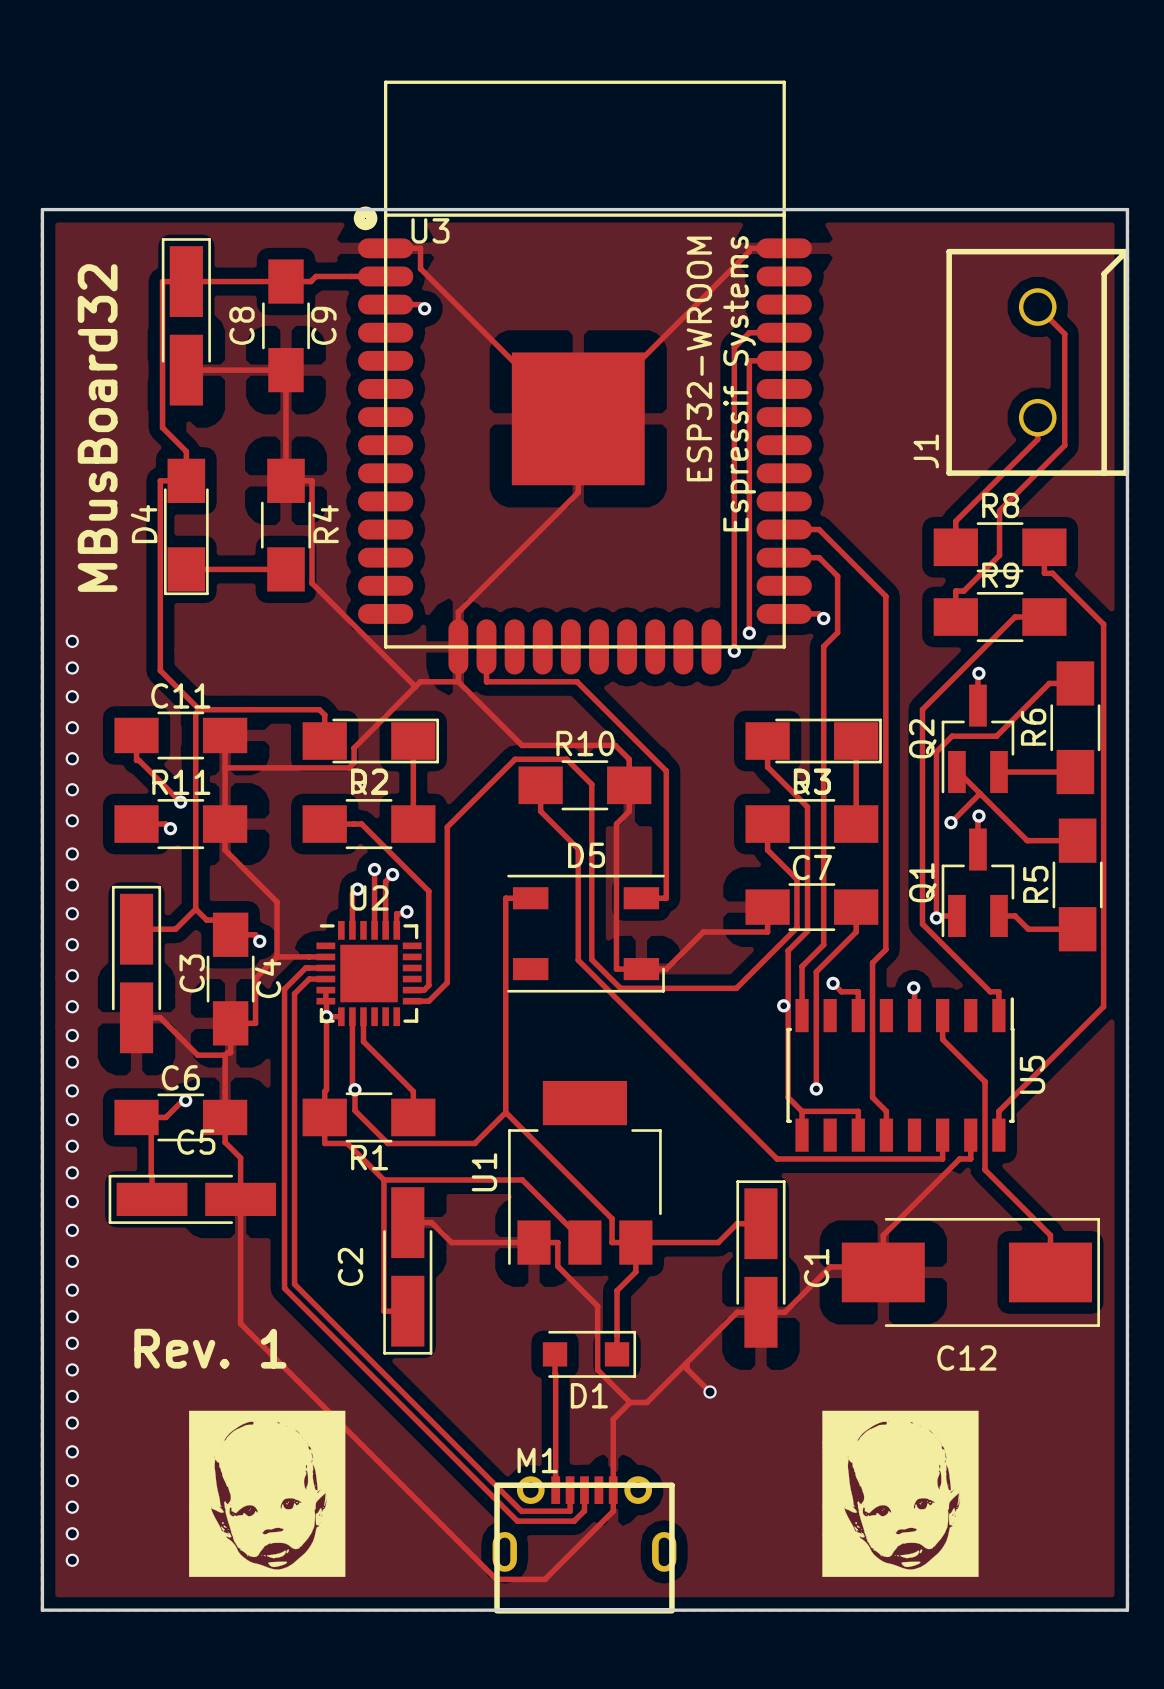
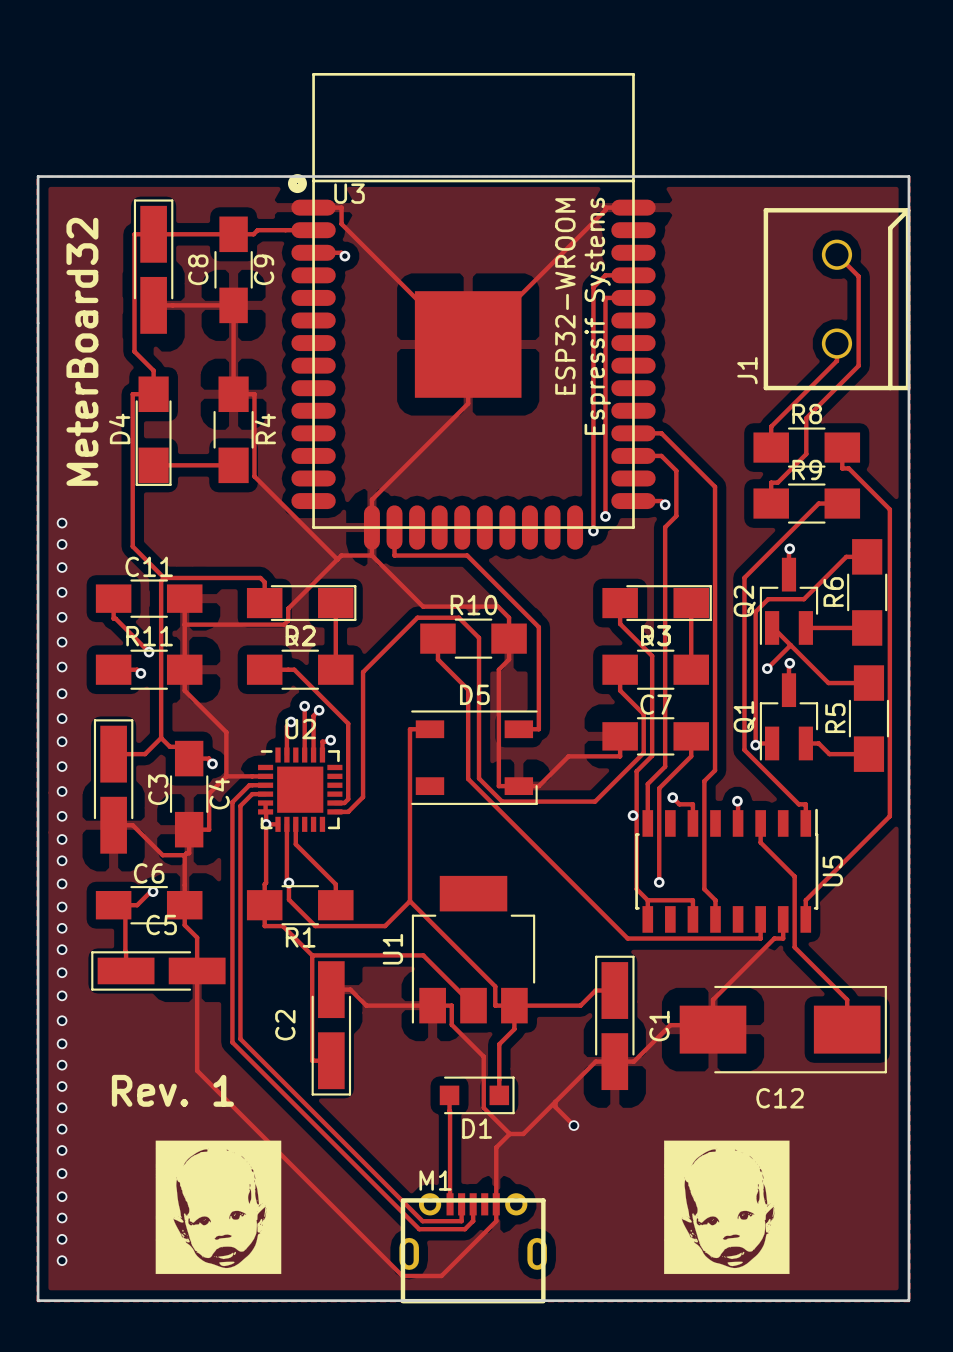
text: MBusBoard32 (97, 428) -> MeterBoard32 (82, 351)

